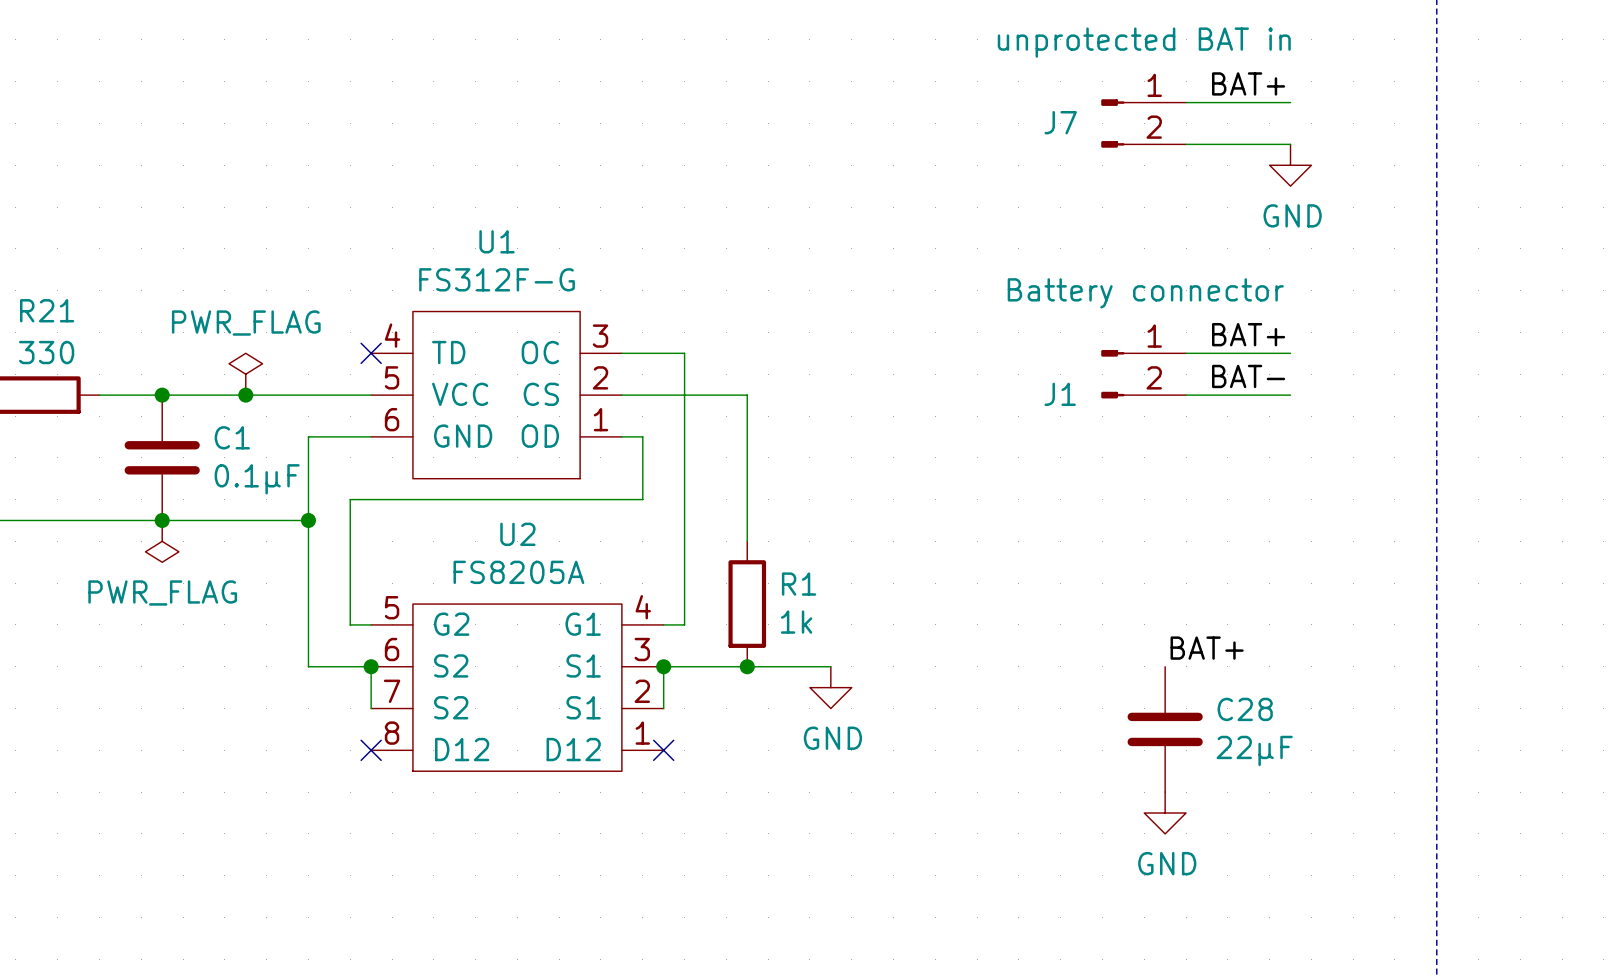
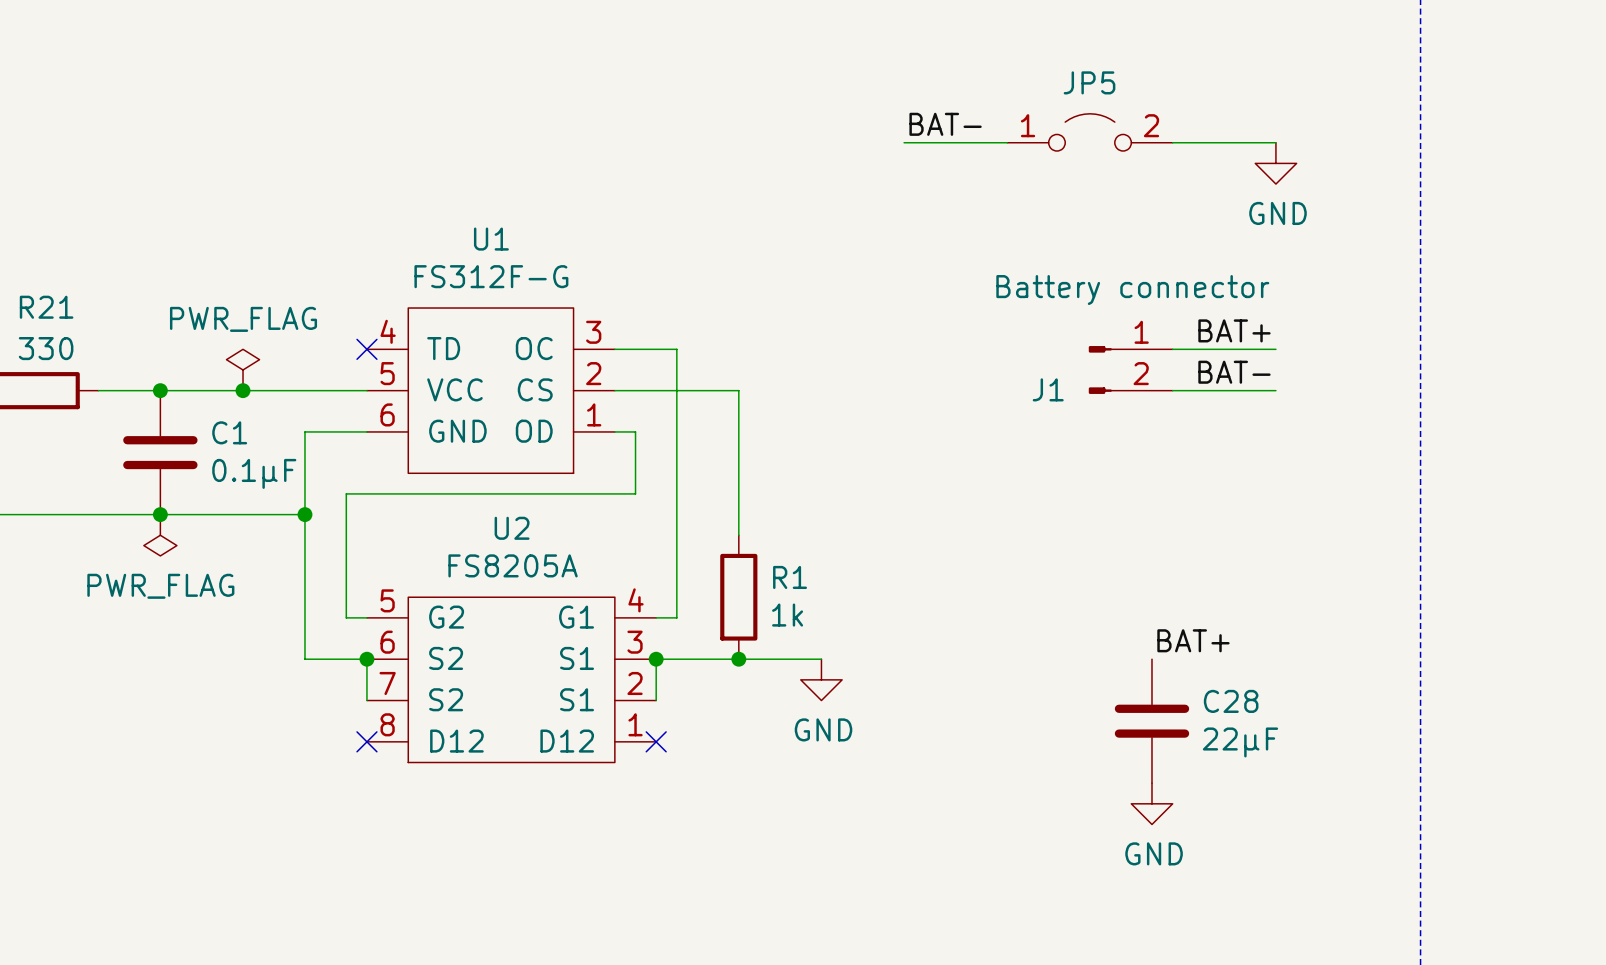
label: BAT+ (1248, 83) -> none
wire: (1186, 102) (1290, 102) -> (904, 142) (1007, 142)
J7: unprotected BAT in (1143, 123) -> none
label: none -> BAT- (945, 124)
JP5: none -> (1090, 132)

